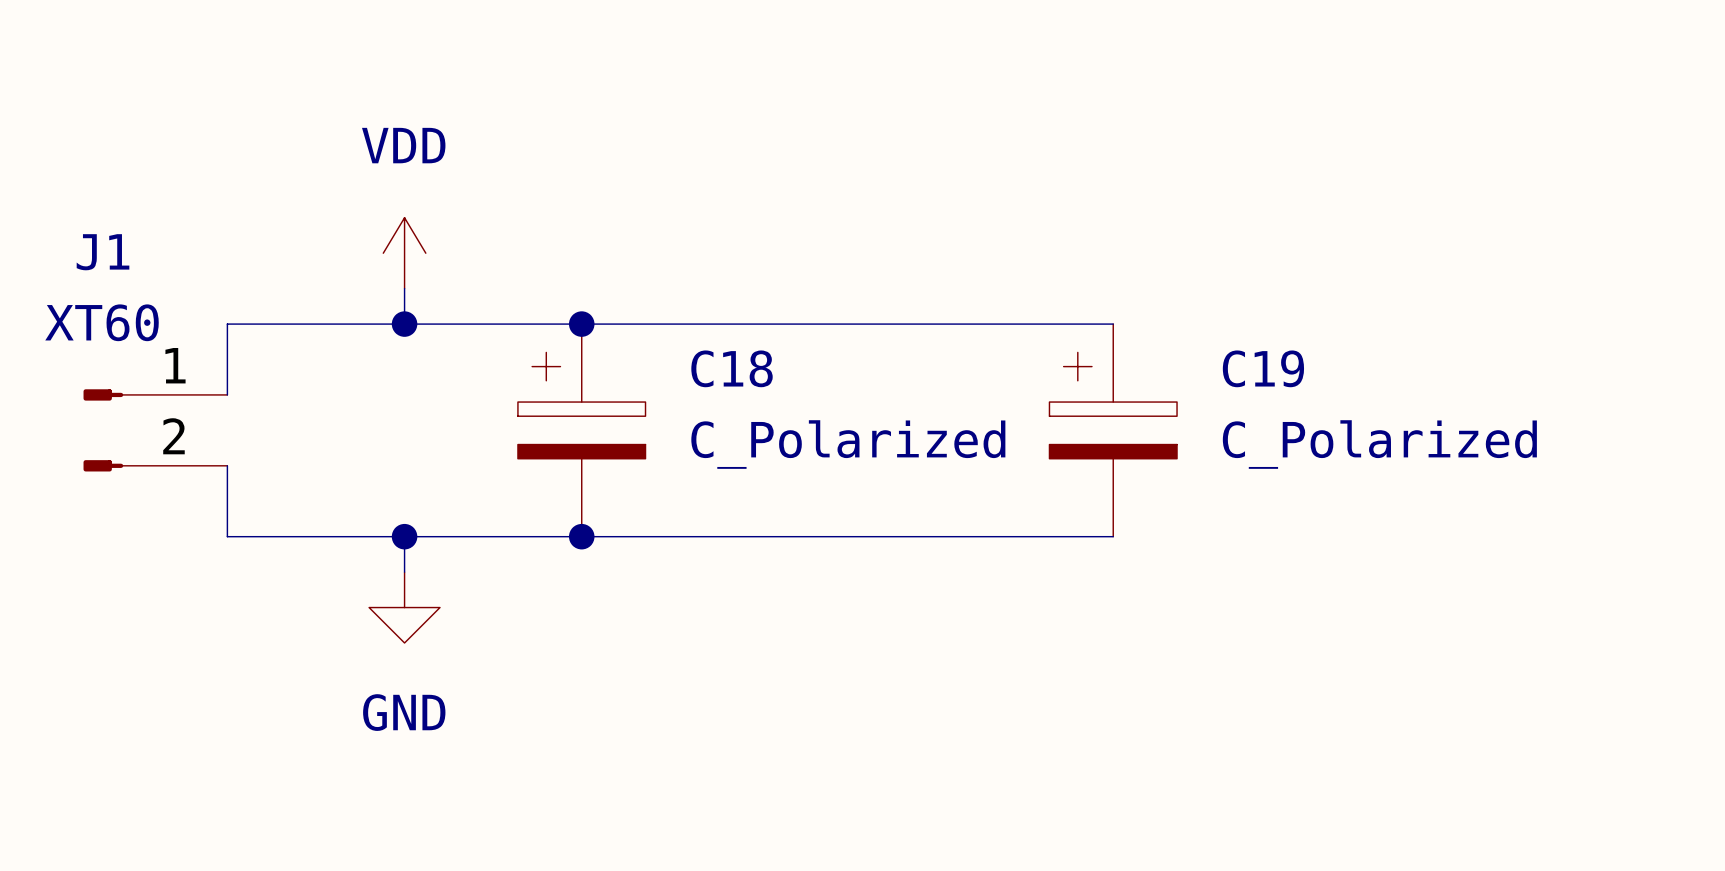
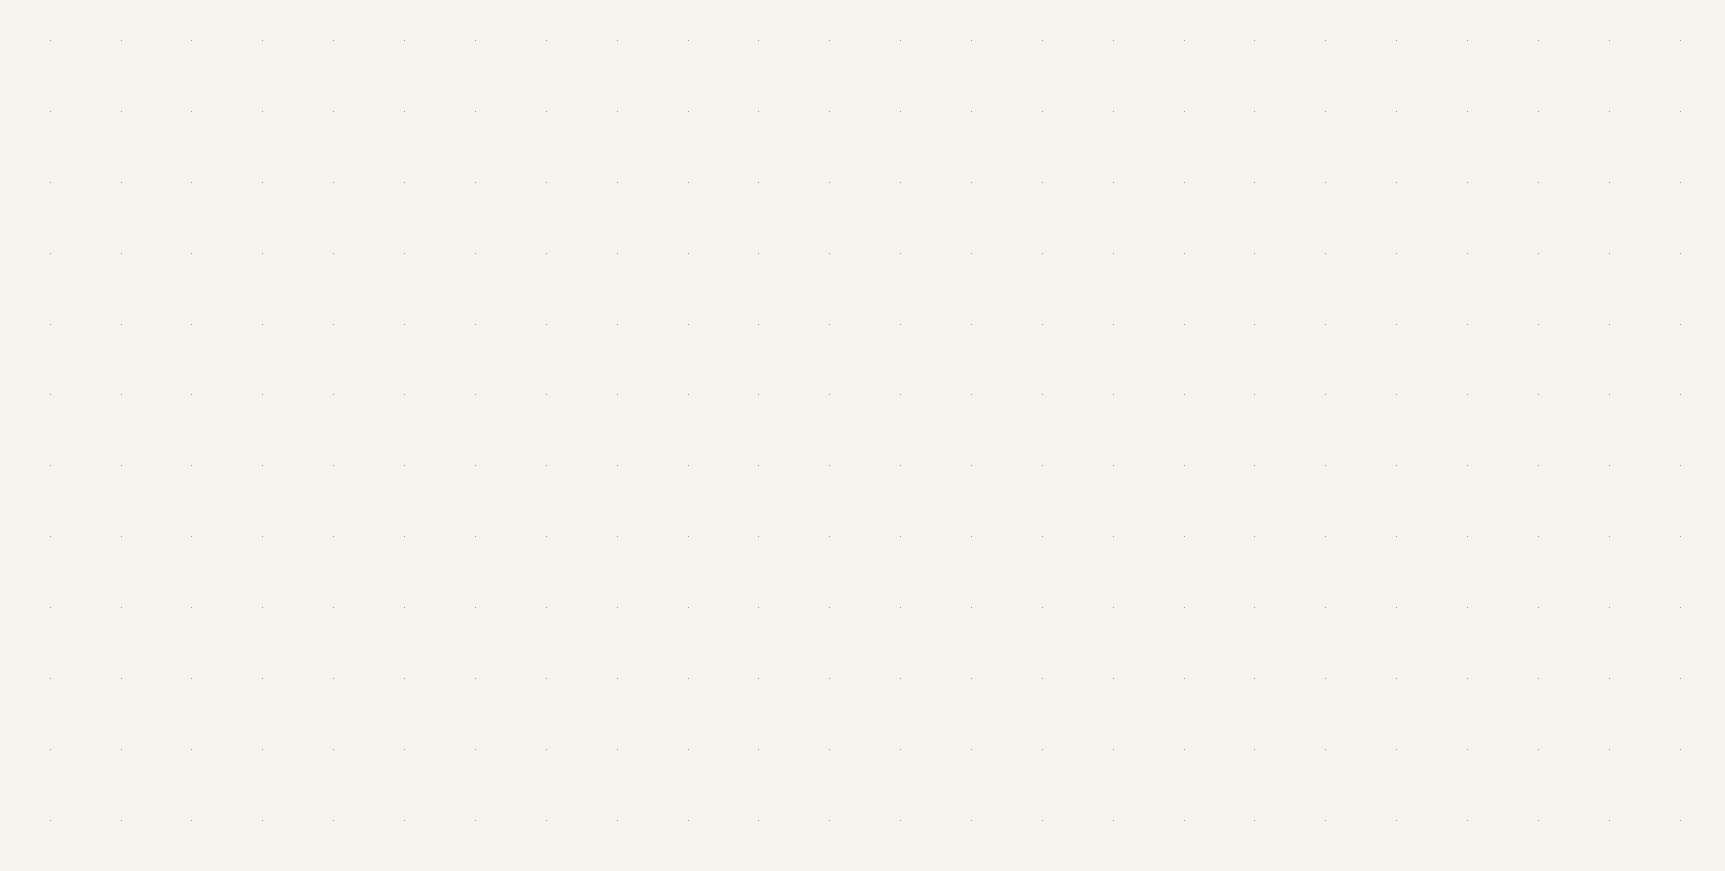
power symbol: VDD (404, 253) -> none
wire: (404, 288) (404, 324) -> none
junction: (404, 324) -> none
junction: (581, 324) -> none
wire: (1113, 324) (227, 324) (227, 394) -> none
J1: XT60 (155, 430) -> none
C18: C_Polarized (581, 430) -> none
C19: C_Polarized (1113, 430) -> none
wire: (227, 465) (227, 536) (1113, 536) -> none
wire: (404, 536) (404, 572) -> none
junction: (404, 536) -> none
junction: (581, 536) -> none
power symbol: GND (404, 607) -> none

